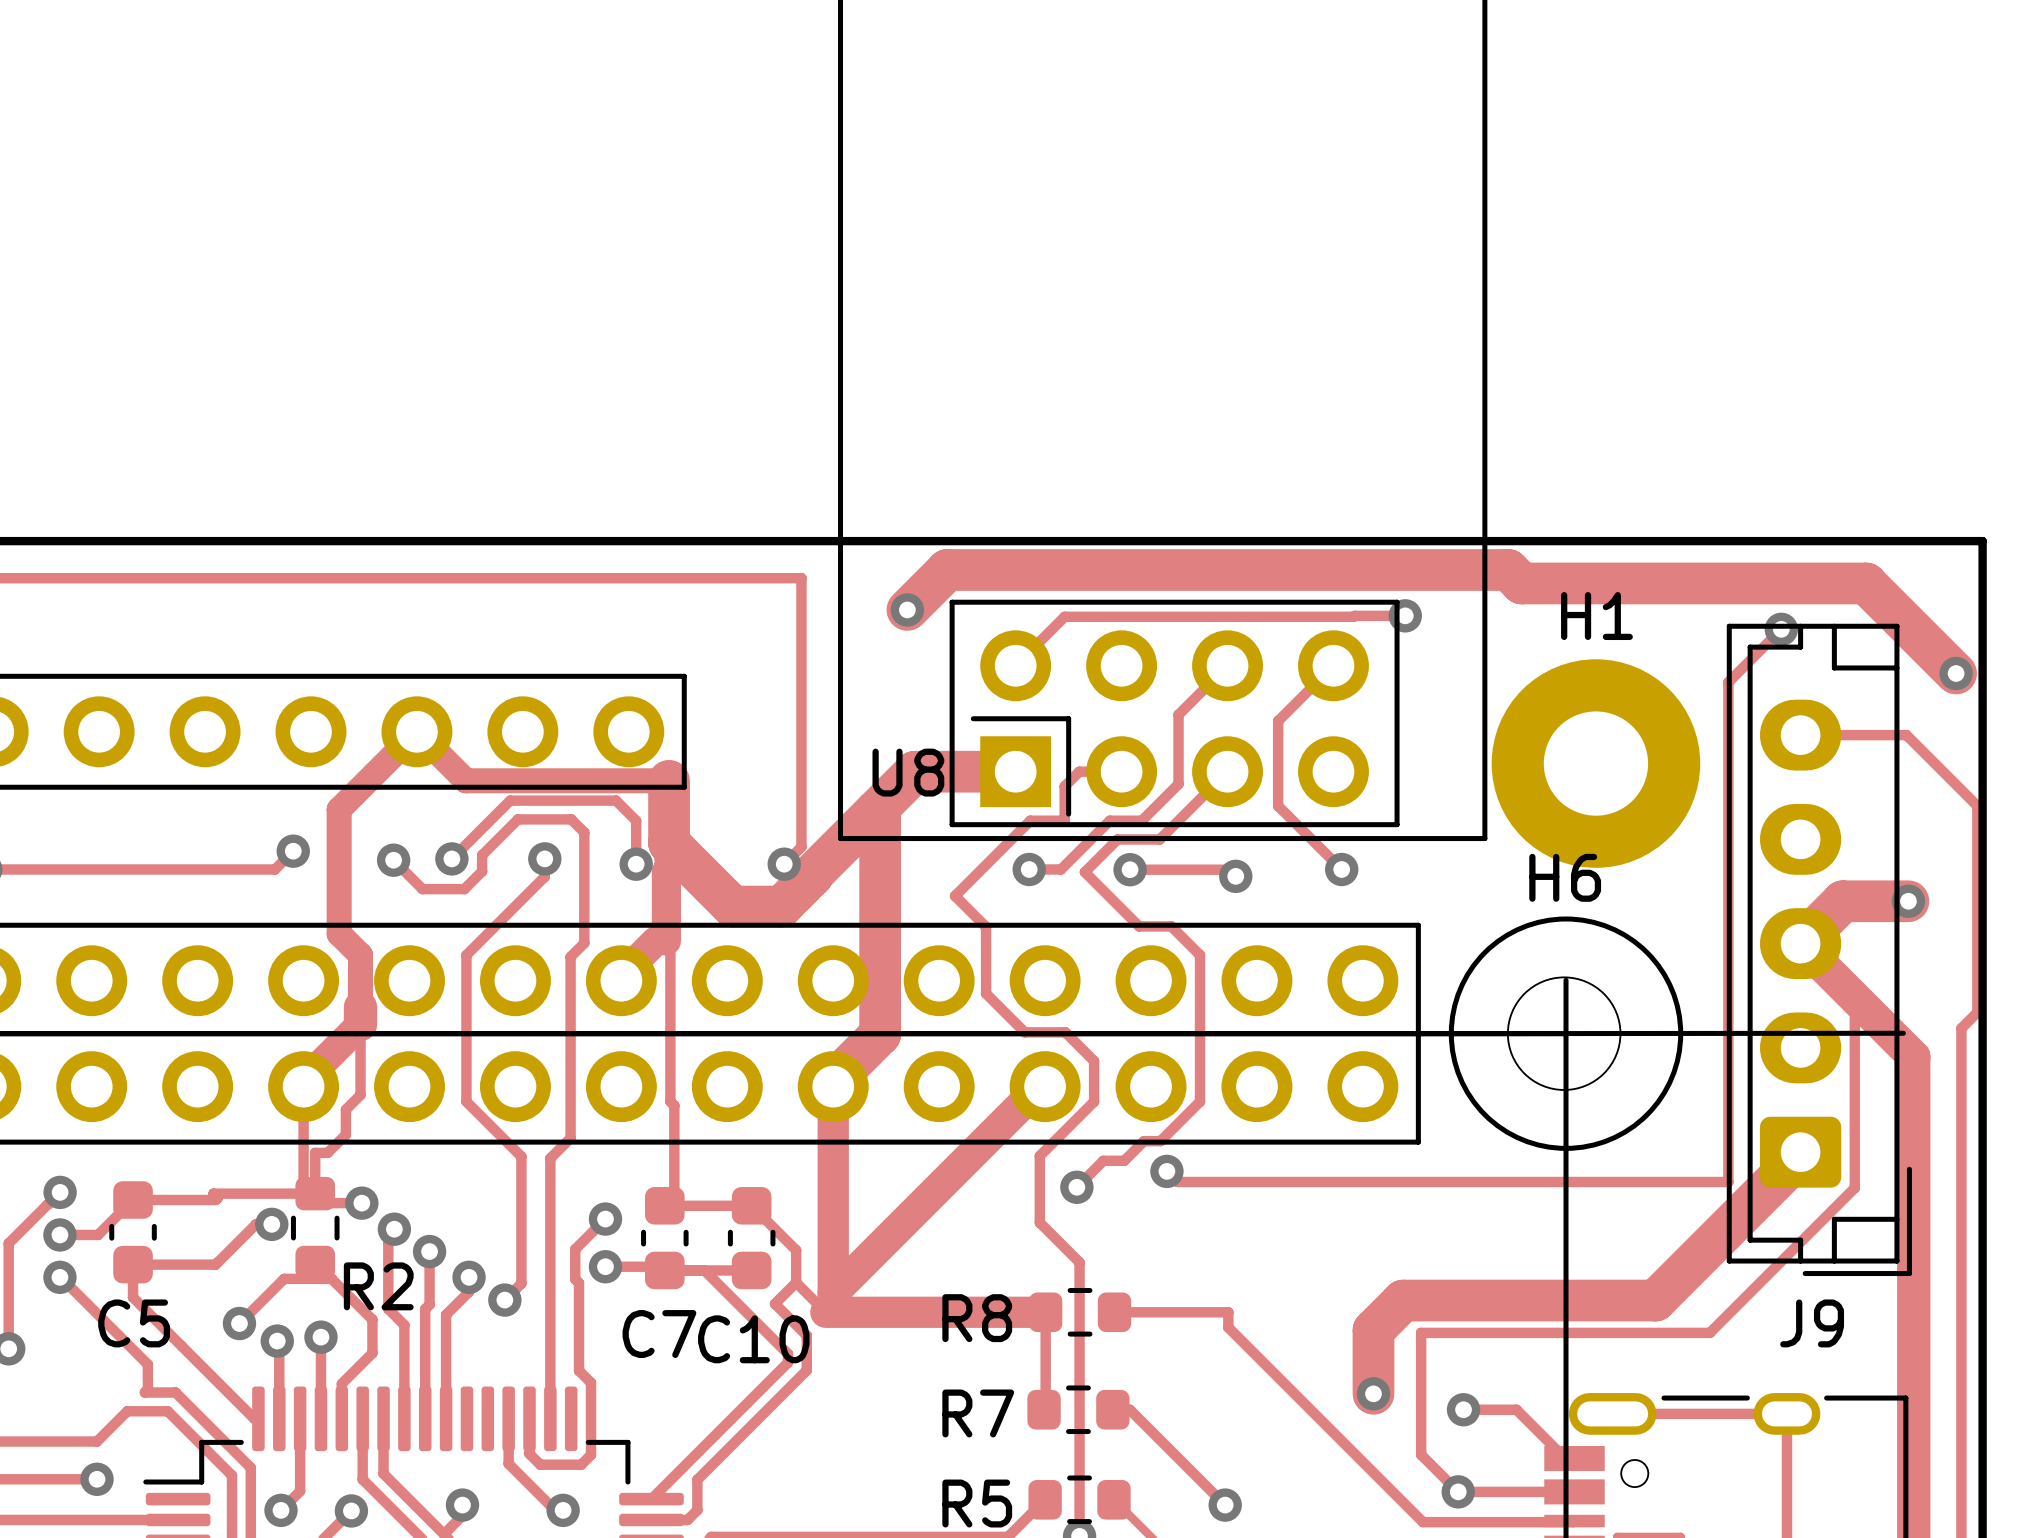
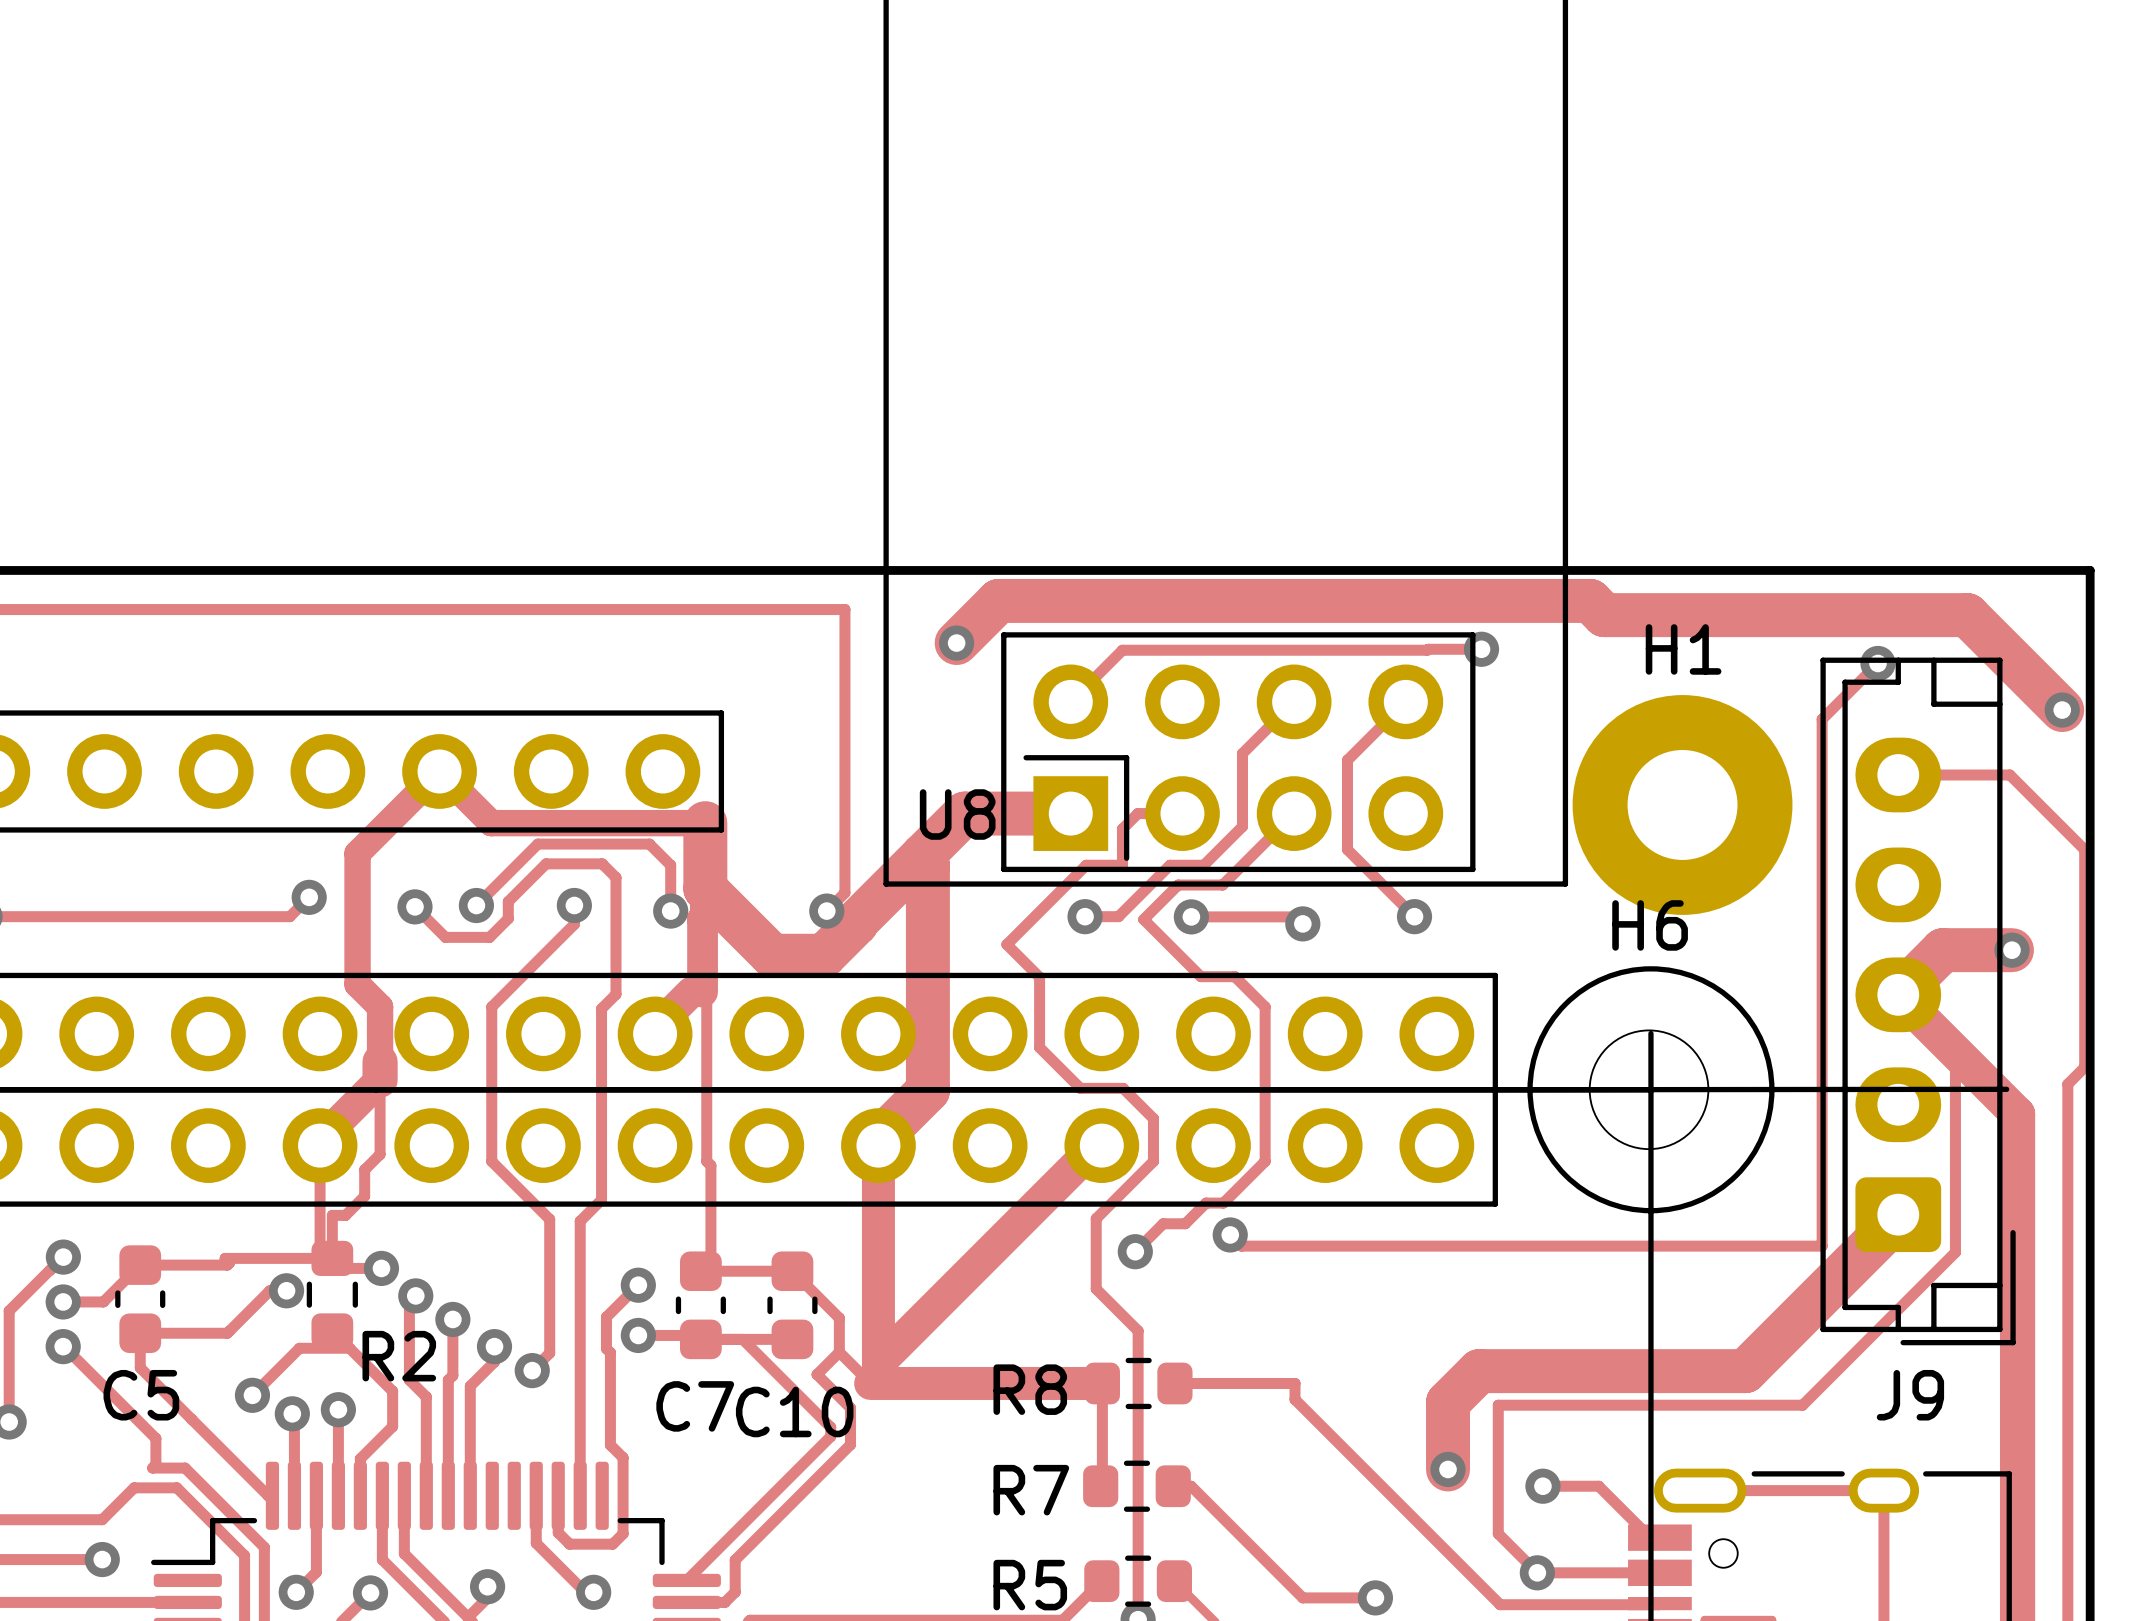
track: none -> (1291, 1586) (1302, 1597) (1375, 1597)
via position: (1225, 1505) -> (1375, 1597)

